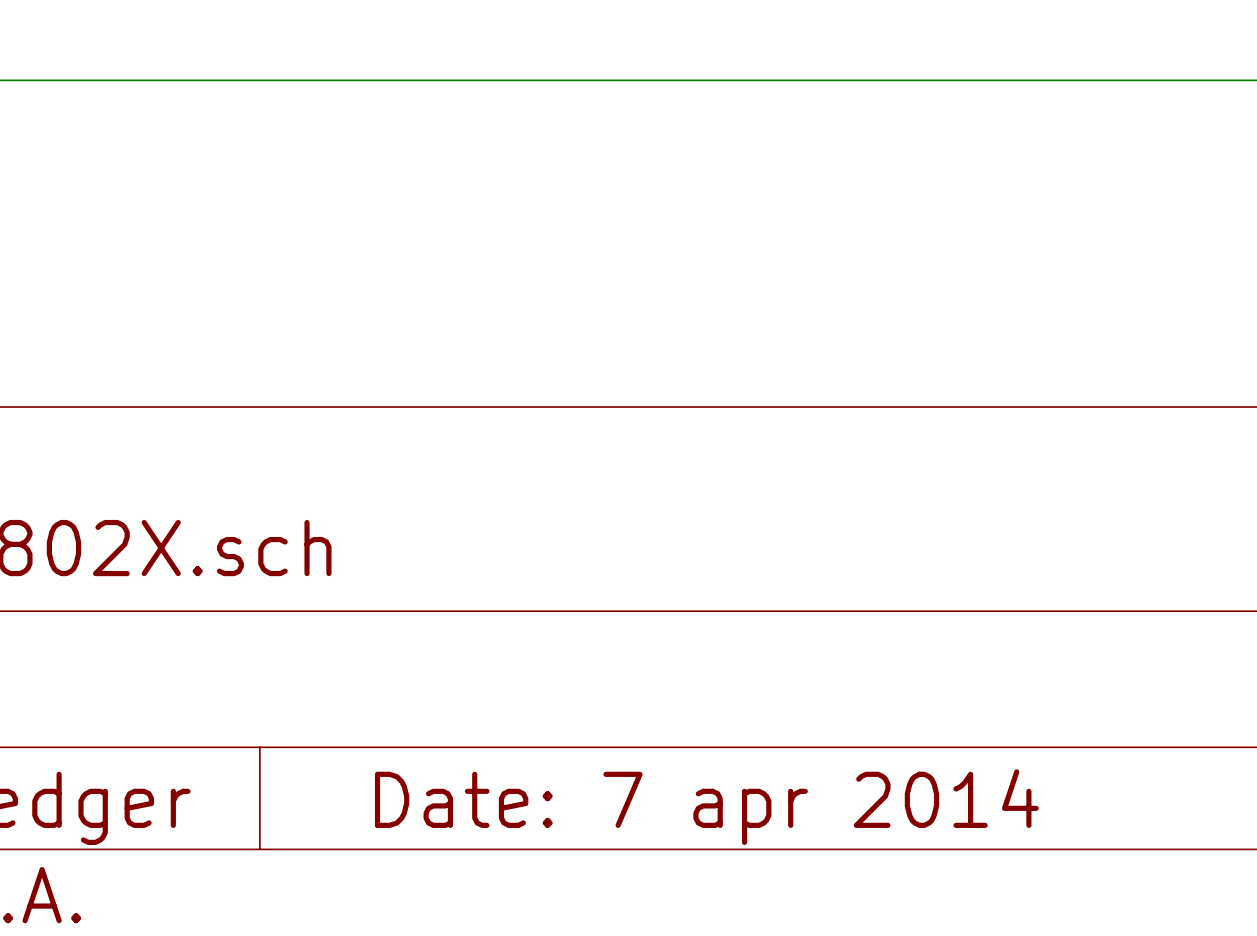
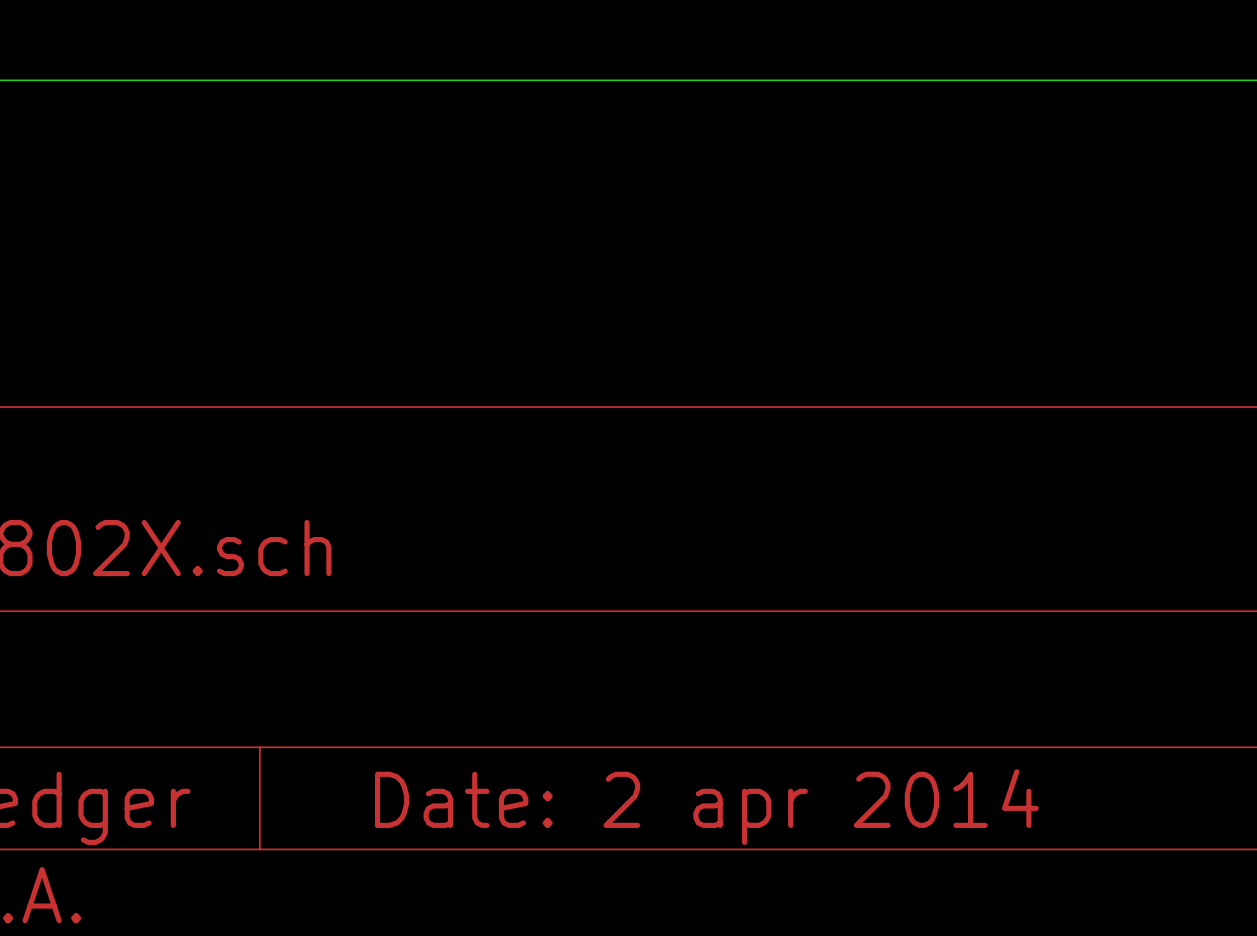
title block: Date: 7 apr 2014 (706, 807) -> Date: 2 apr 2014 (706, 807)

